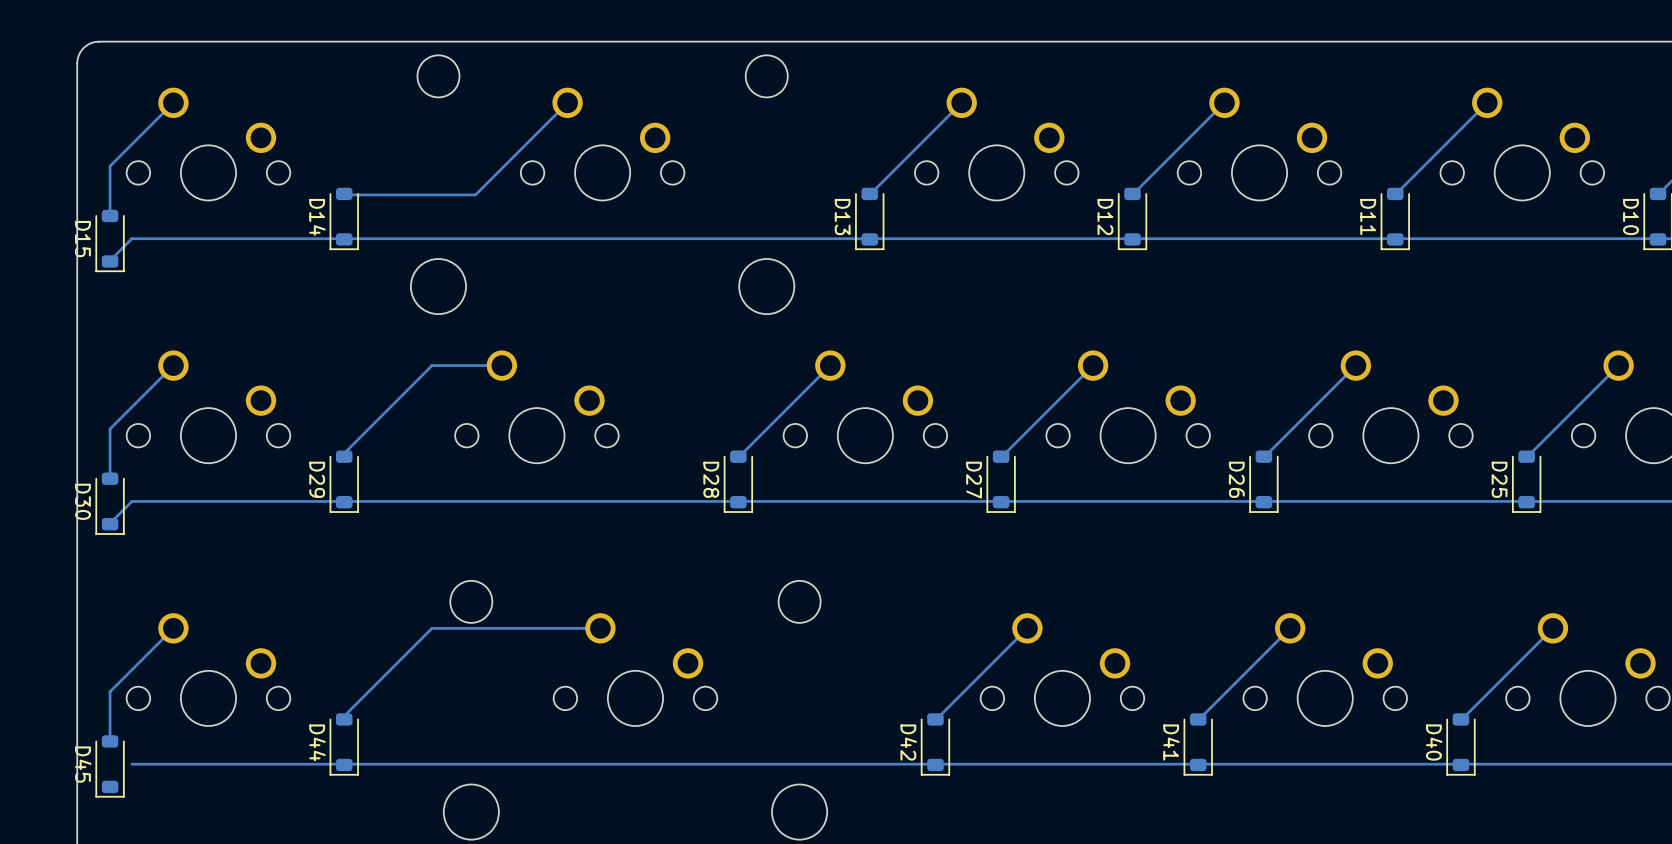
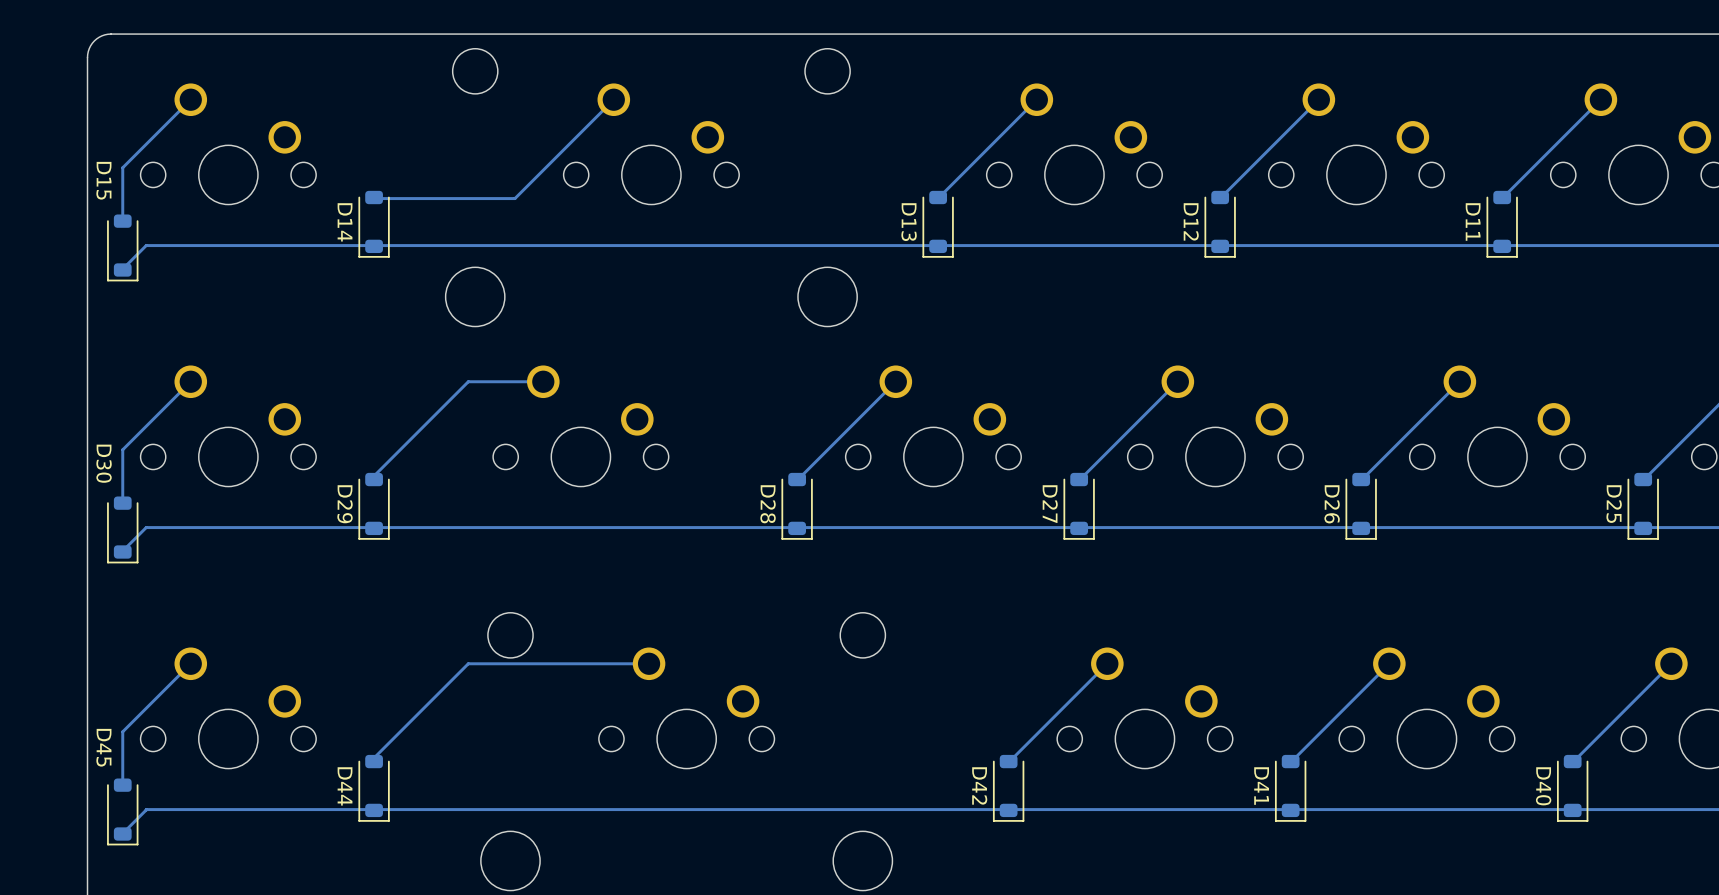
D15 name position: D15 (82, 239) -> D15 (103, 180)
D30 name position: D30 (82, 501) -> D30 (104, 463)
D45 name position: D45 (83, 764) -> D45 (103, 747)
track: none -> (146, 809) (124, 831)

